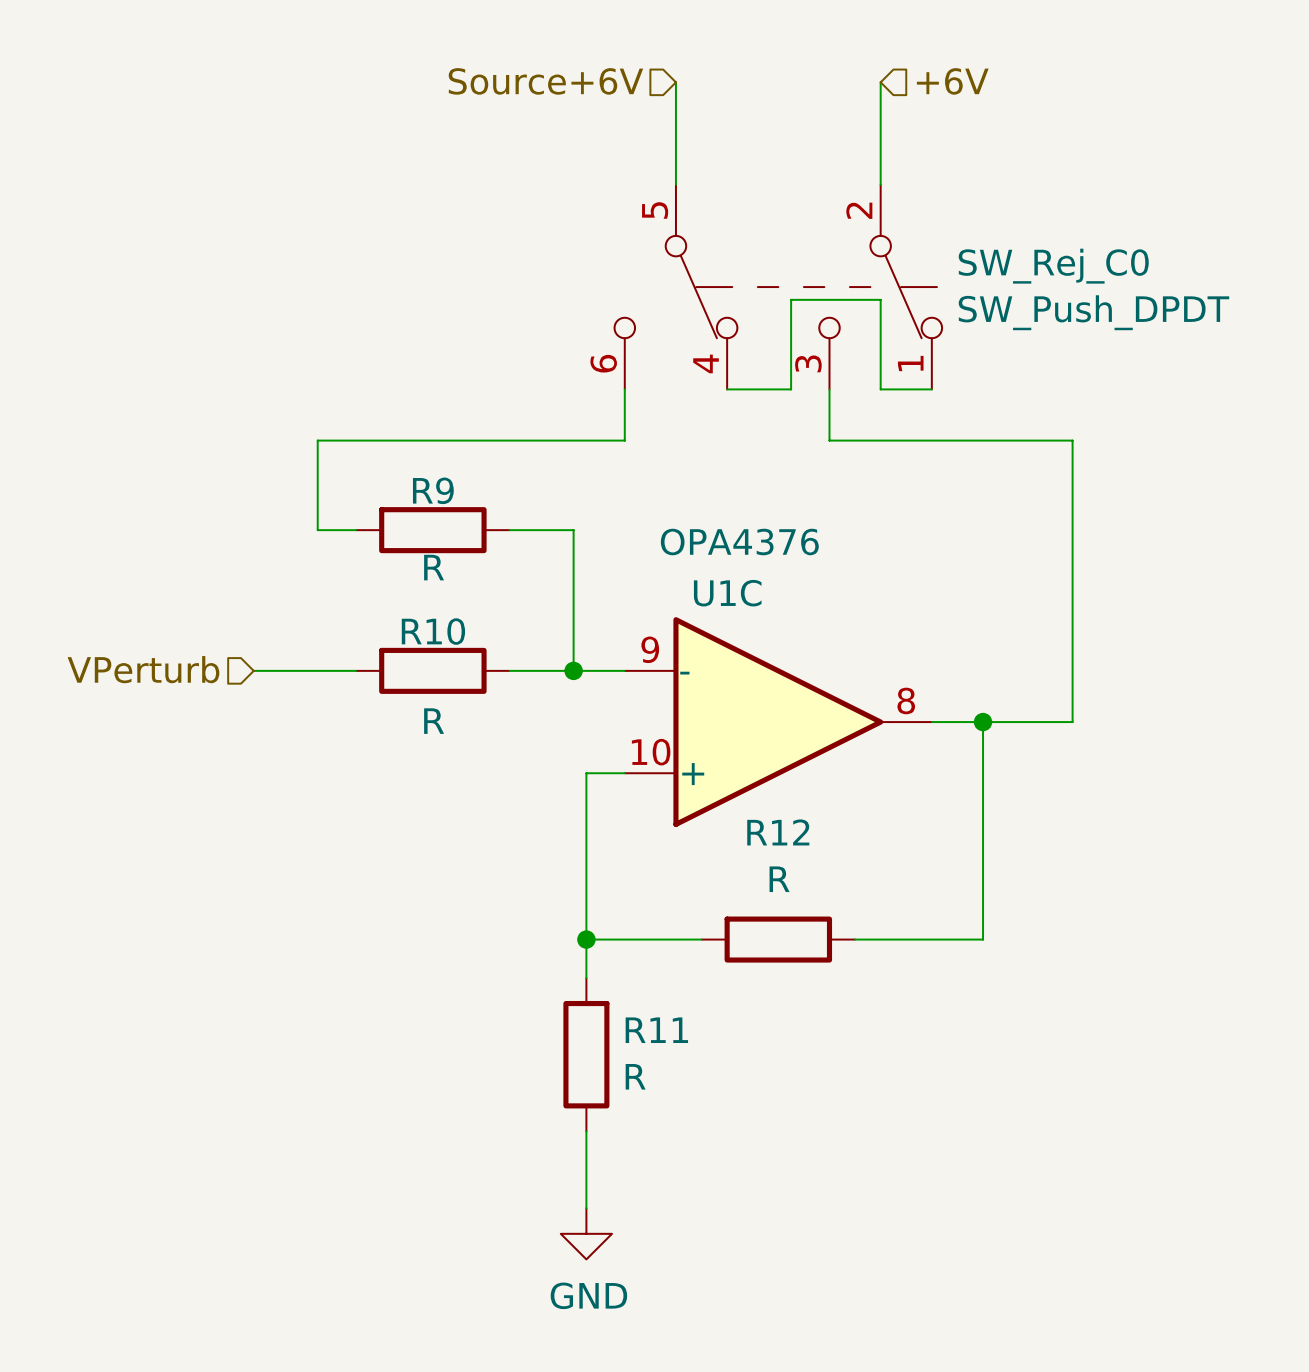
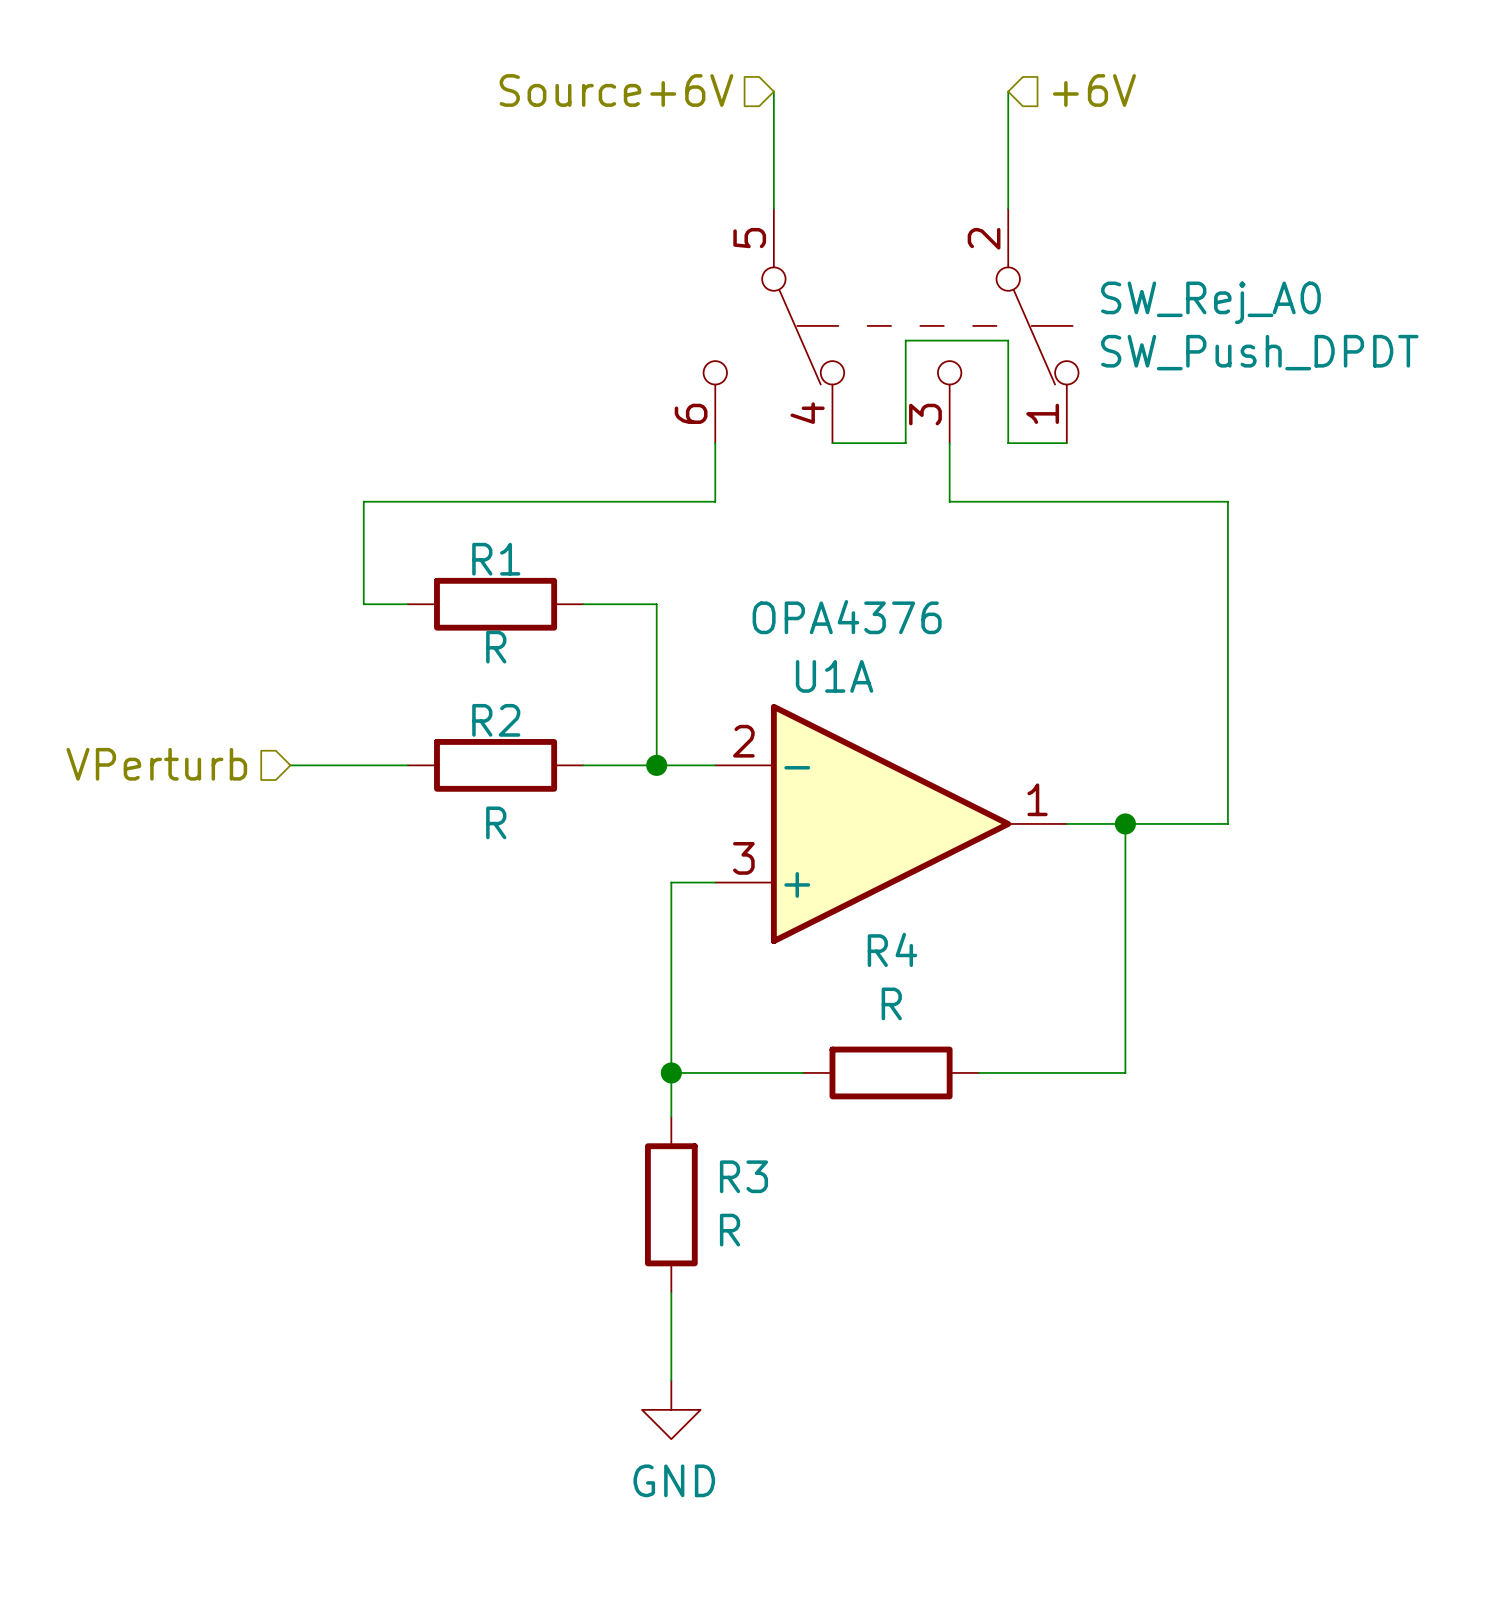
SW_Rej_C0 name: SW_Rej_C0 (1053, 266) -> SW_Rej_A0 (1210, 302)
R9 name: R9 (433, 490) -> R1 (496, 559)
U1C name: U1C (727, 593) -> U1A (834, 676)
R10 name: R10 (433, 631) -> R2 (496, 720)
U1C pin number: 9 (650, 649) -> 2 (743, 741)
U1C pin number: 8 (906, 700) -> 1 (1037, 799)
U1C pin number: 10 (651, 752) -> 3 (743, 858)
R12 name: R12 (778, 832) -> R4 (892, 949)
R11 name: R11 (656, 1030) -> R3 (743, 1176)

